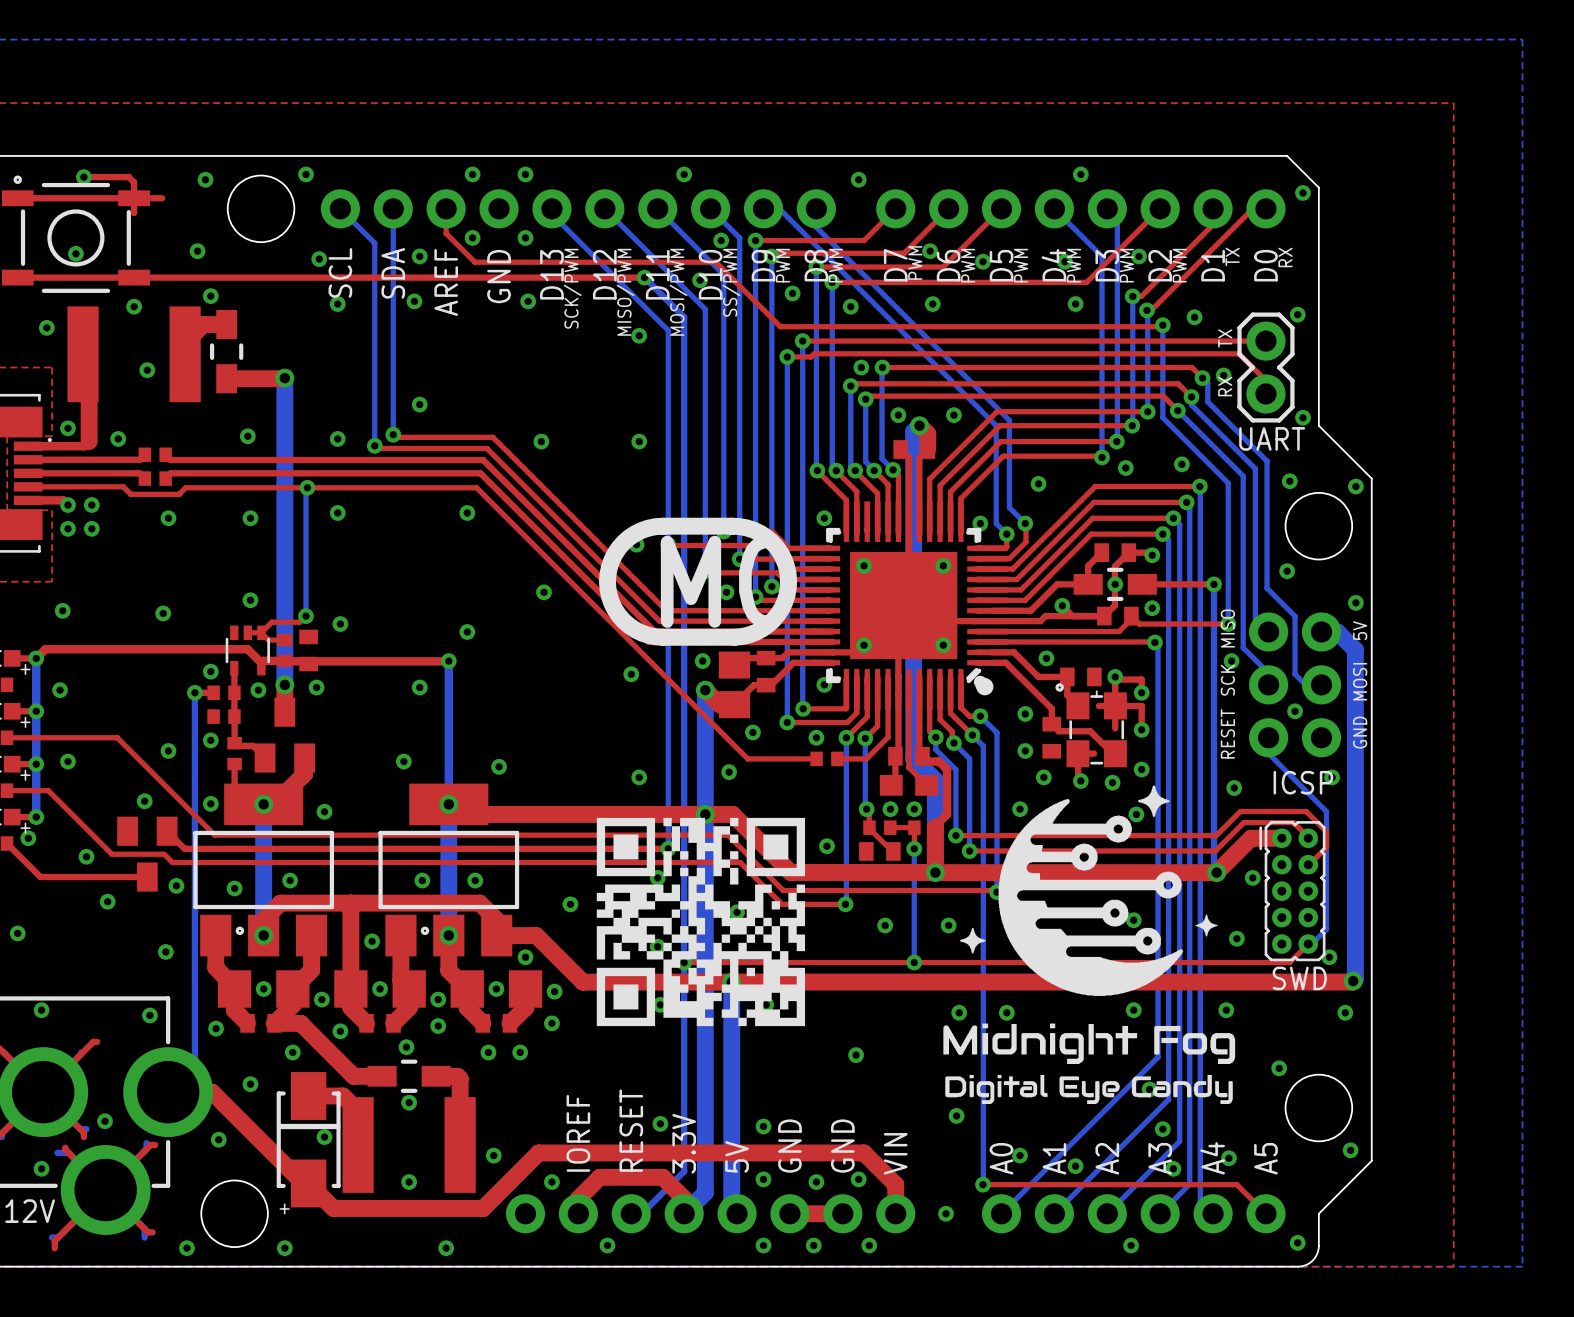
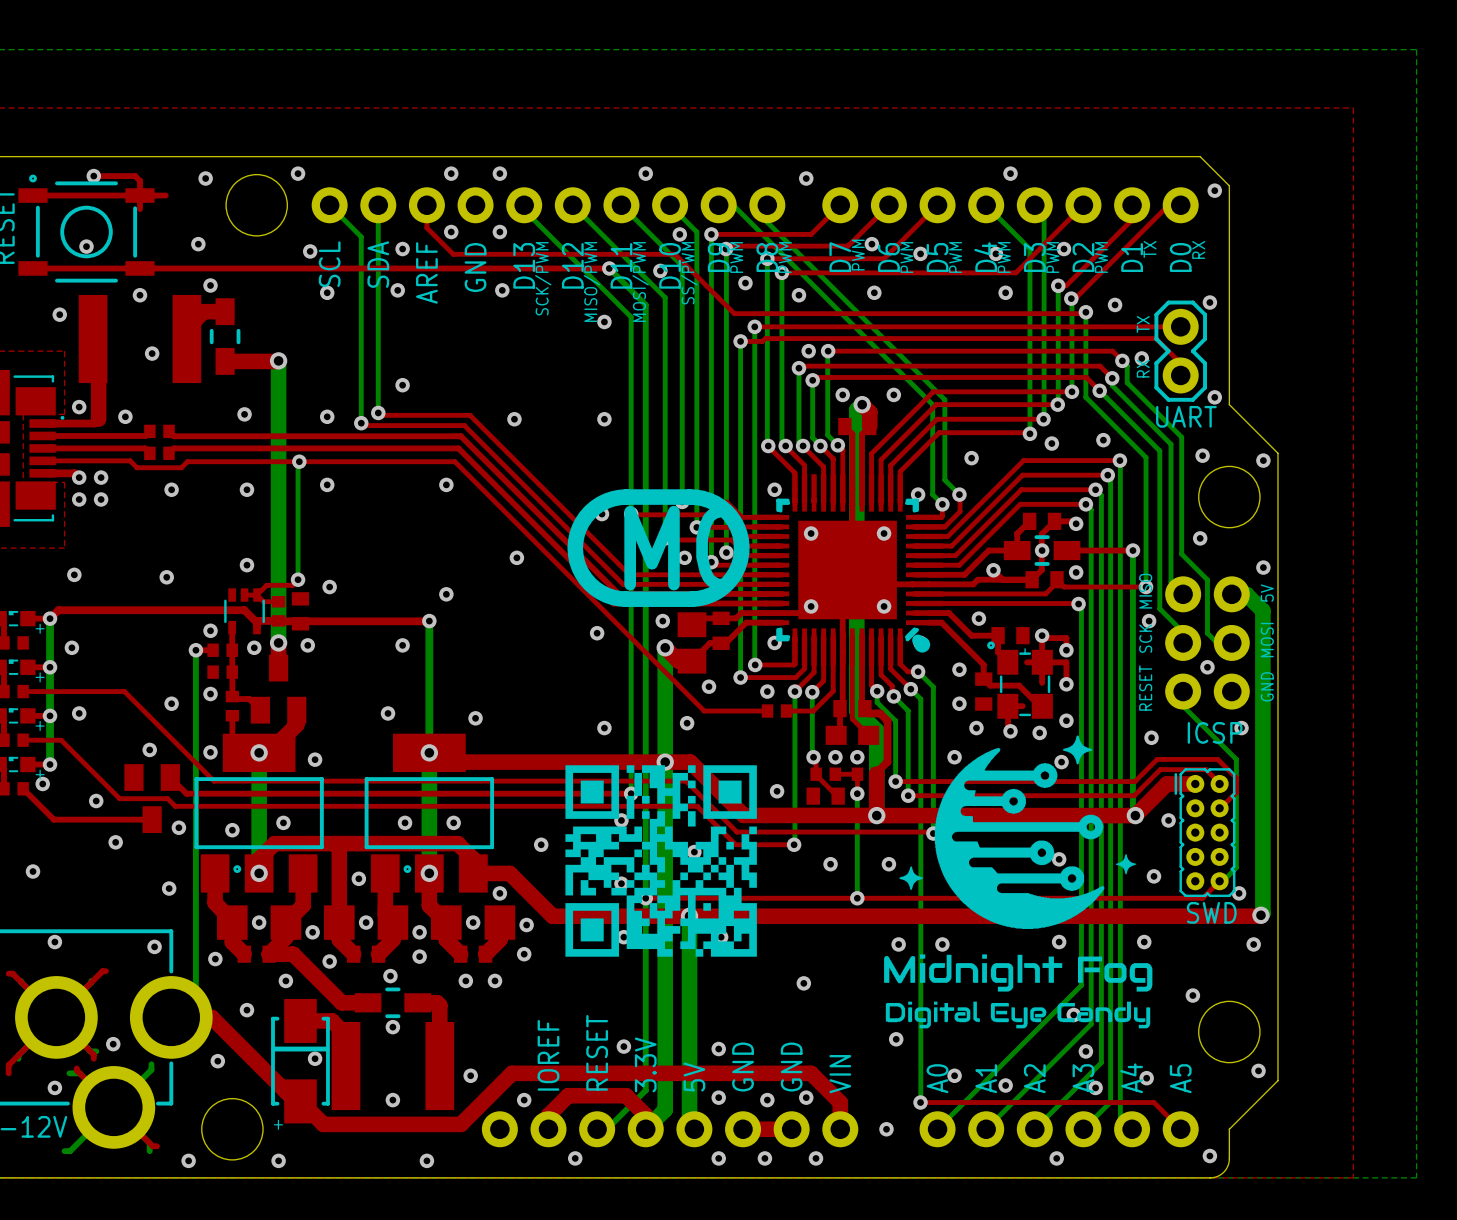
top track: (155, 1145) (150, 1145) (54, 1240) (54, 1248) -> none

